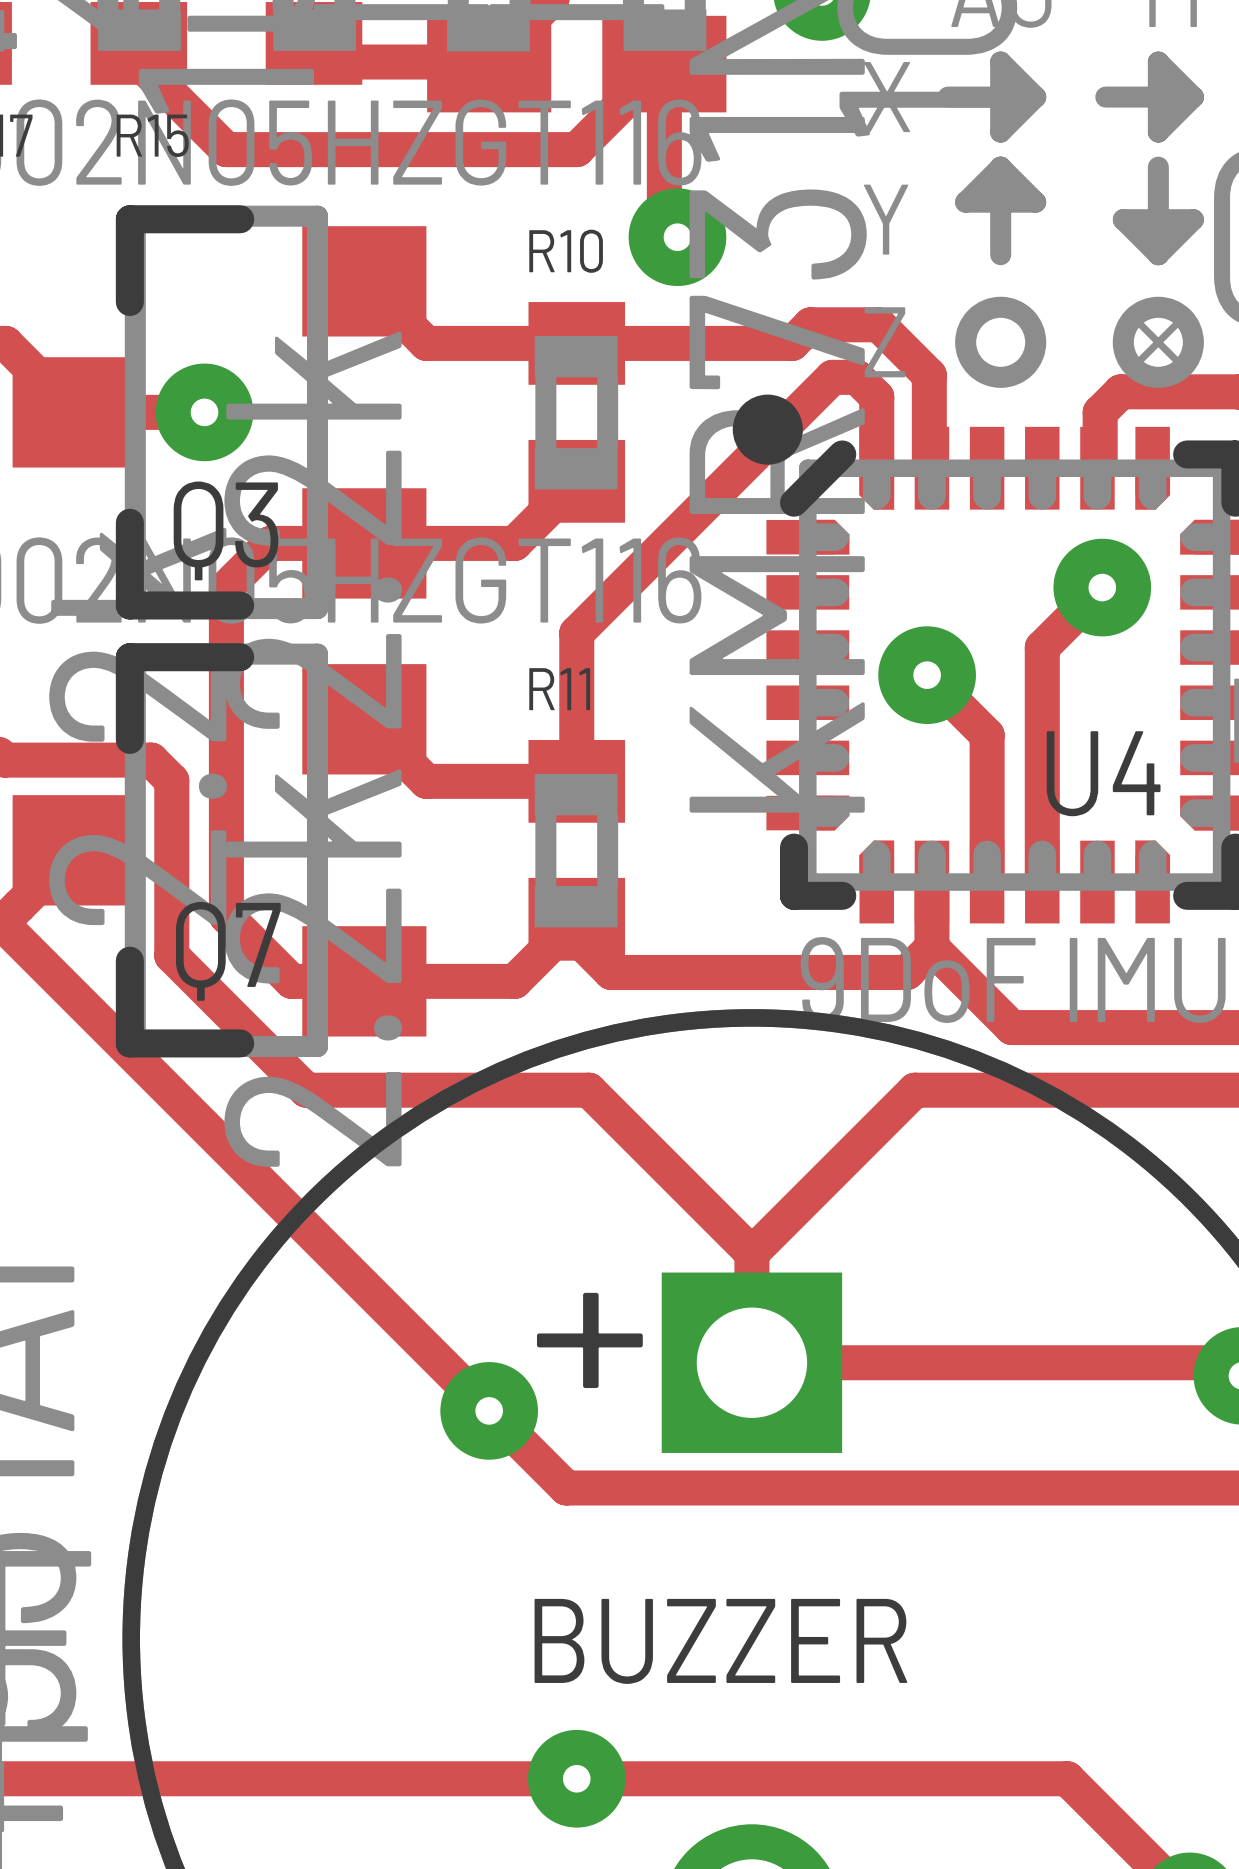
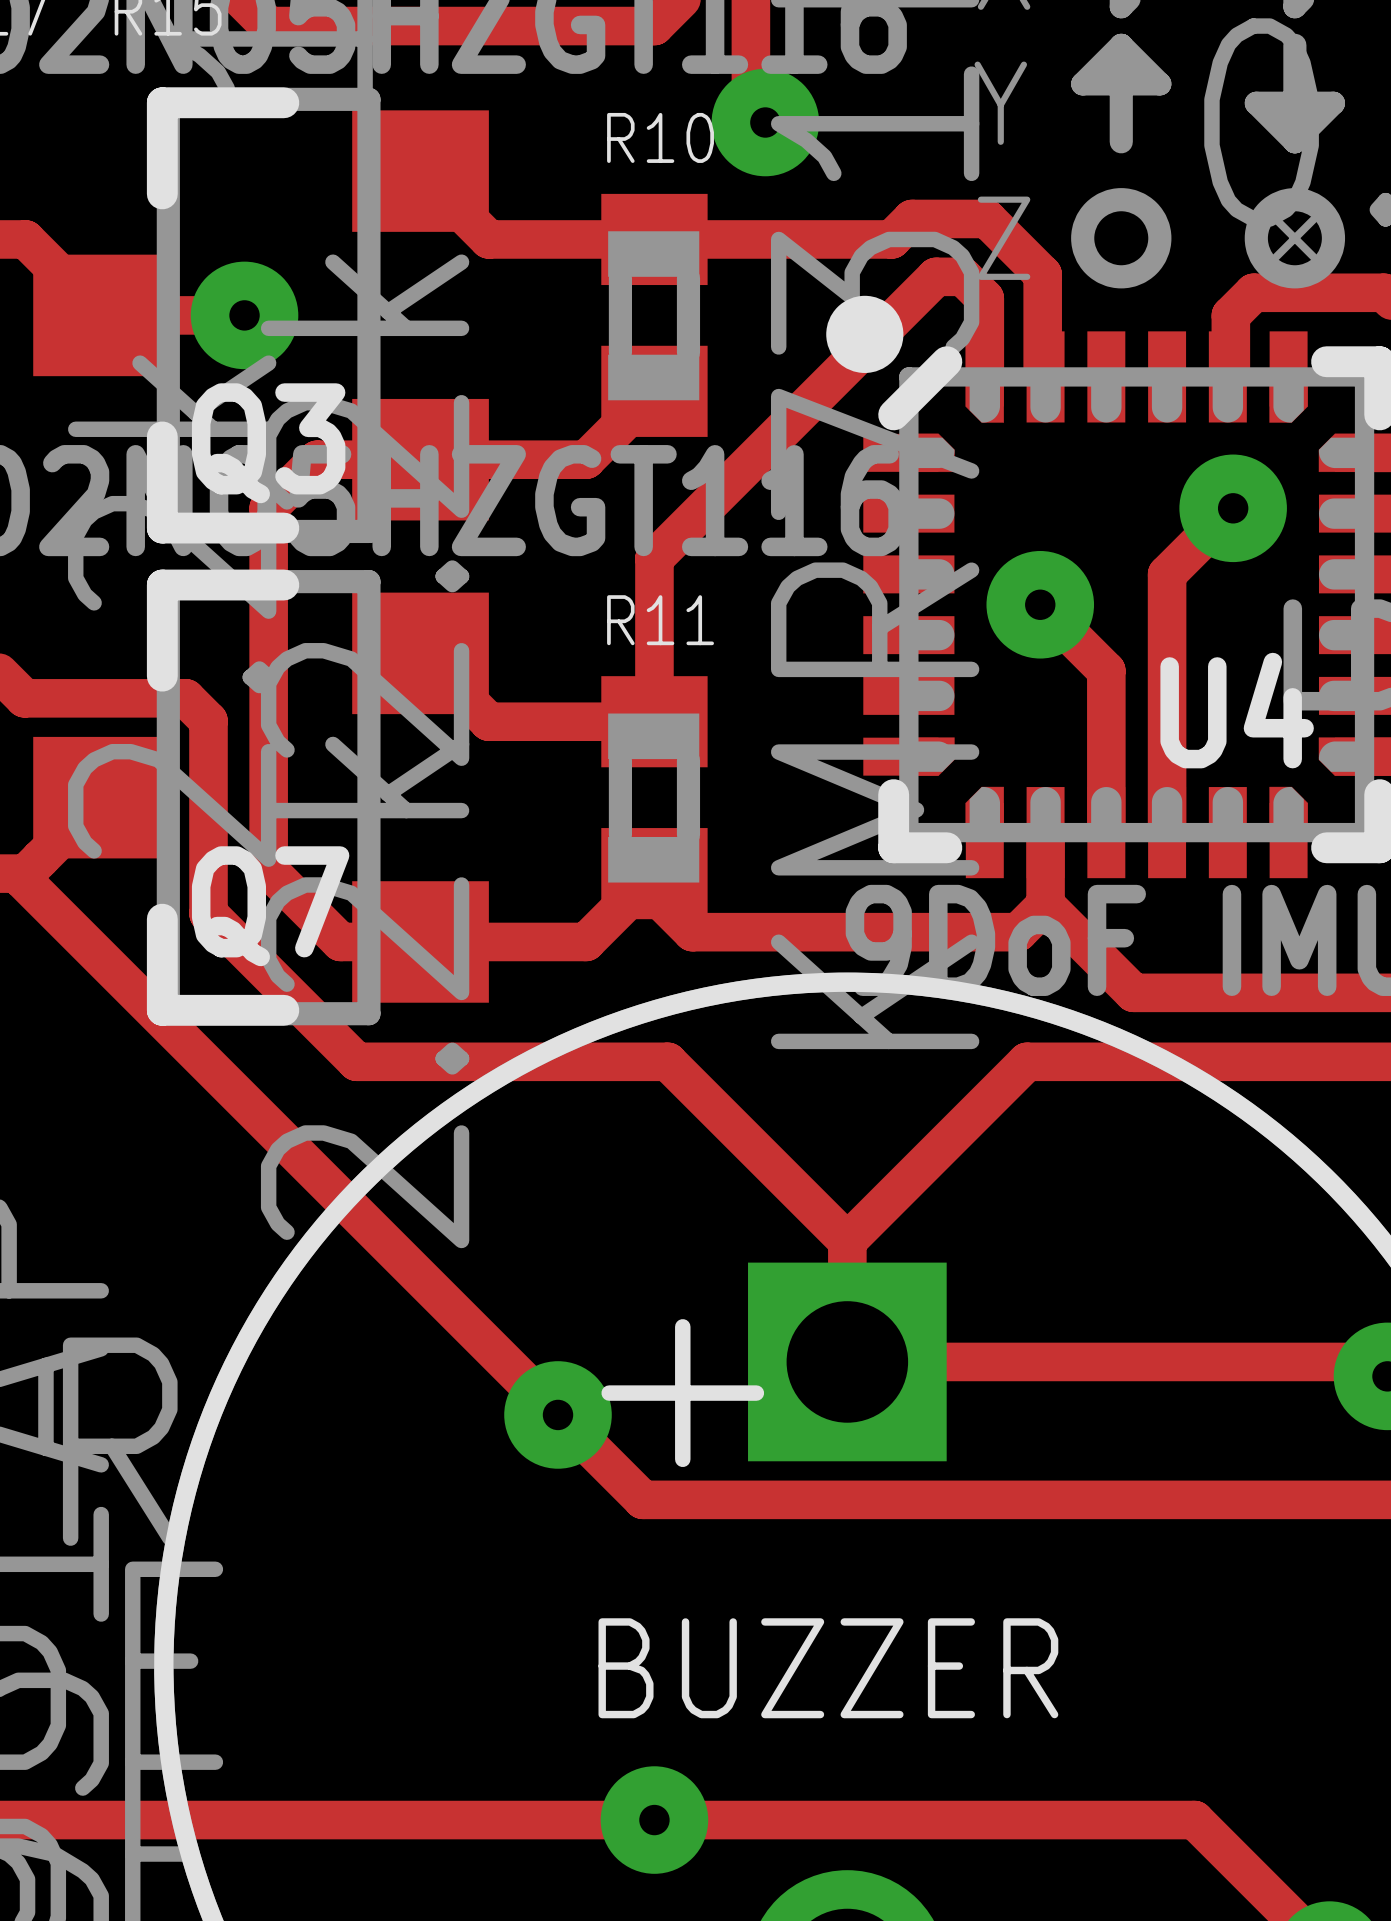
BUZZER name position: BUZZER (720, 1641) -> BUZZER (828, 1668)

